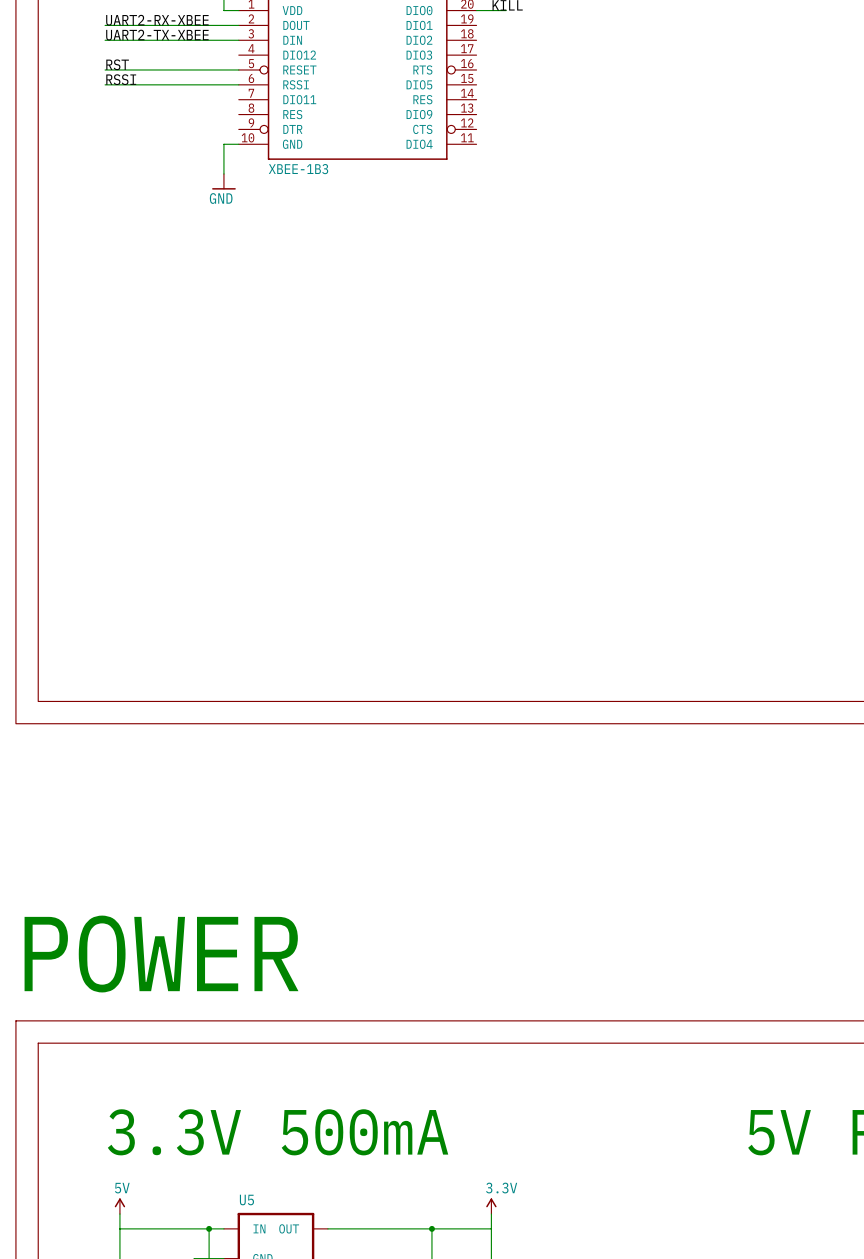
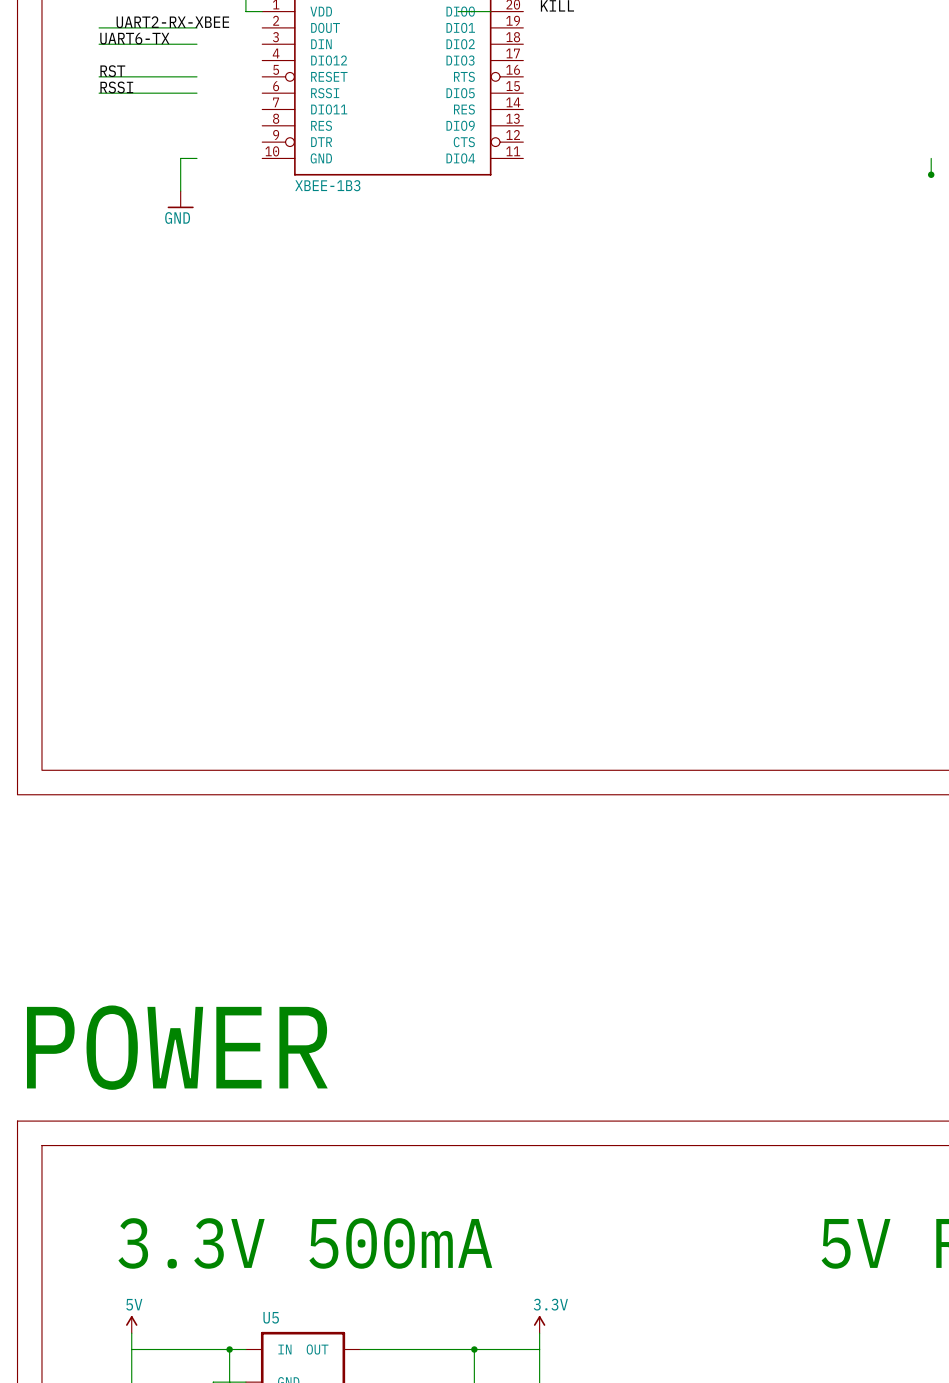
wire: (476, 10) (506, 10) -> (458, 11) (490, 11)
wire: none -> (99, 27) (115, 27)
wire: (179, 25) (238, 25) -> none
label: UART2-TX-XBEE (157, 35) -> UART6-TX (134, 38)
wire: none -> (99, 44) (115, 44)
wire: (179, 40) (238, 40) -> none
label position: RST (117, 64) -> RST (112, 71)
wire: none -> (99, 76) (115, 76)
wire: (179, 69) (238, 69) -> none
label position: RSSI (121, 79) -> RSSI (116, 87)
wire: none -> (99, 93) (115, 93)
wire: (179, 84) (238, 84) -> none
wire: (238, 144) (223, 144) (223, 173) -> (196, 158) (180, 158) (180, 191)
wire: none -> (931, 158) (931, 174)
junction: none -> (931, 174)
power symbol position: GND (223, 181) -> GND (180, 199)

